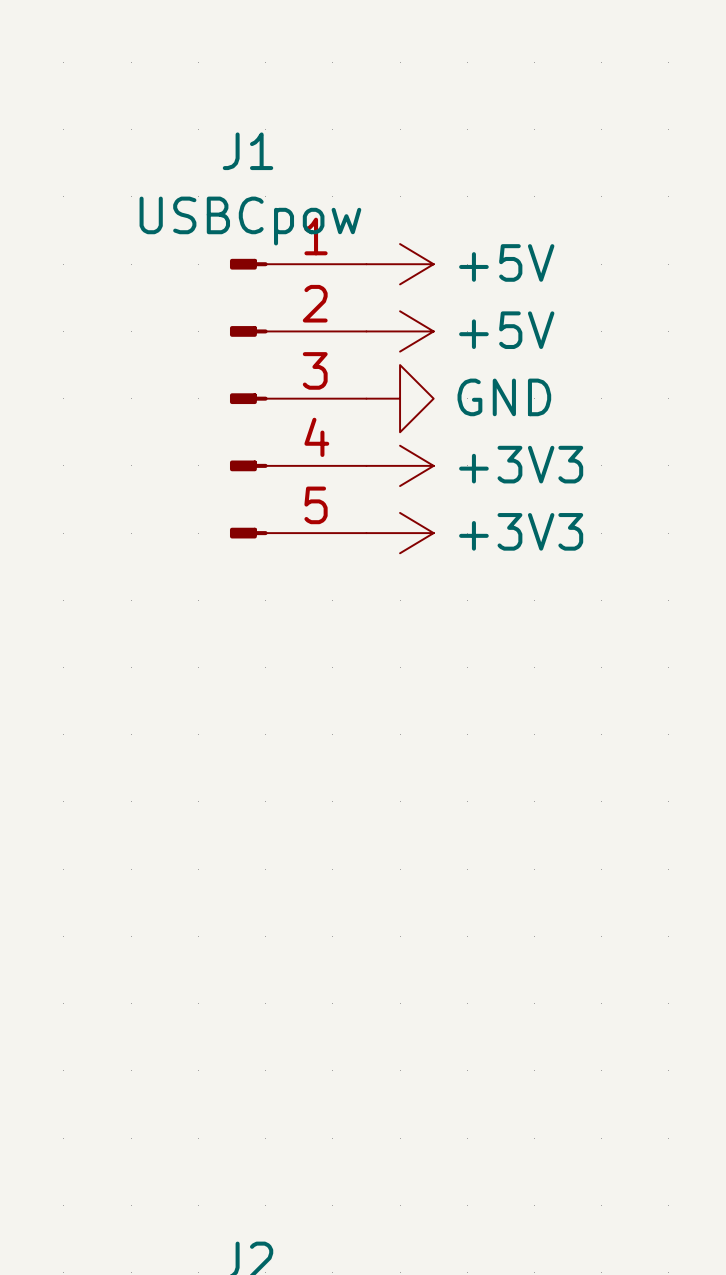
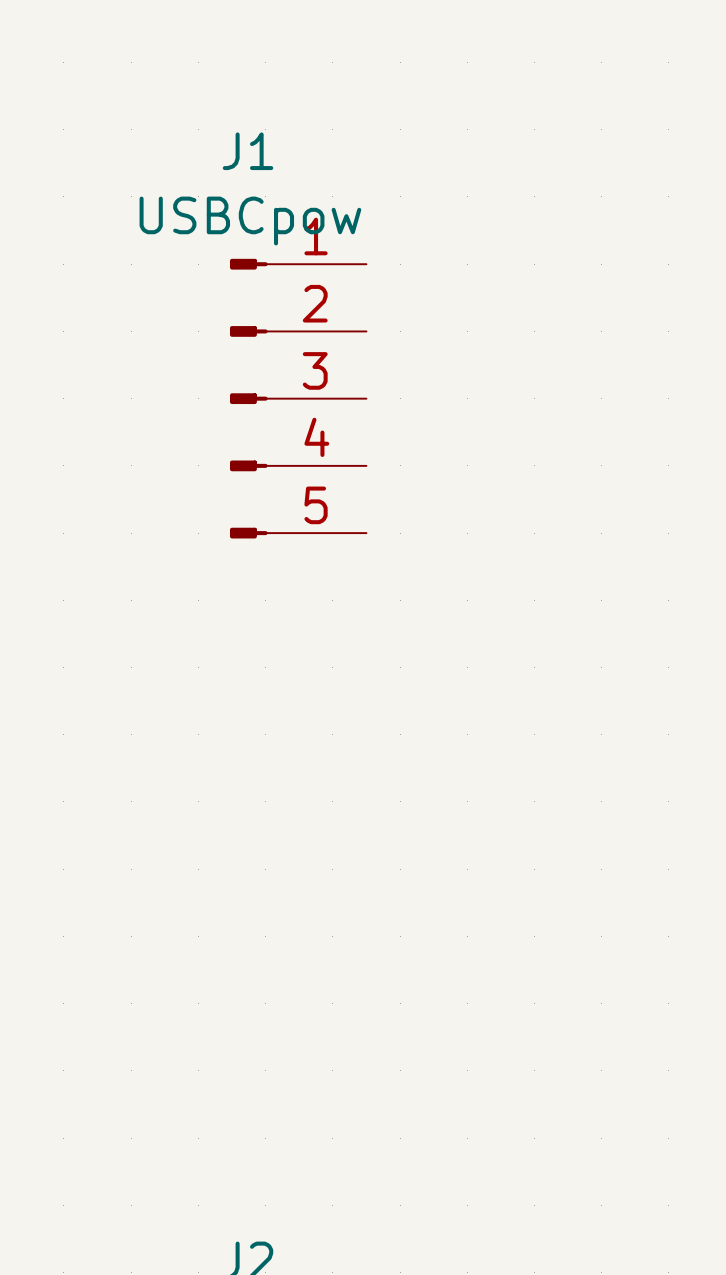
power symbol: +5V (400, 264) -> none
power symbol: +5V (400, 331) -> none
power symbol: GND (400, 398) -> none
power symbol: +3V3 (400, 465) -> none
power symbol: +3V3 (400, 533) -> none

